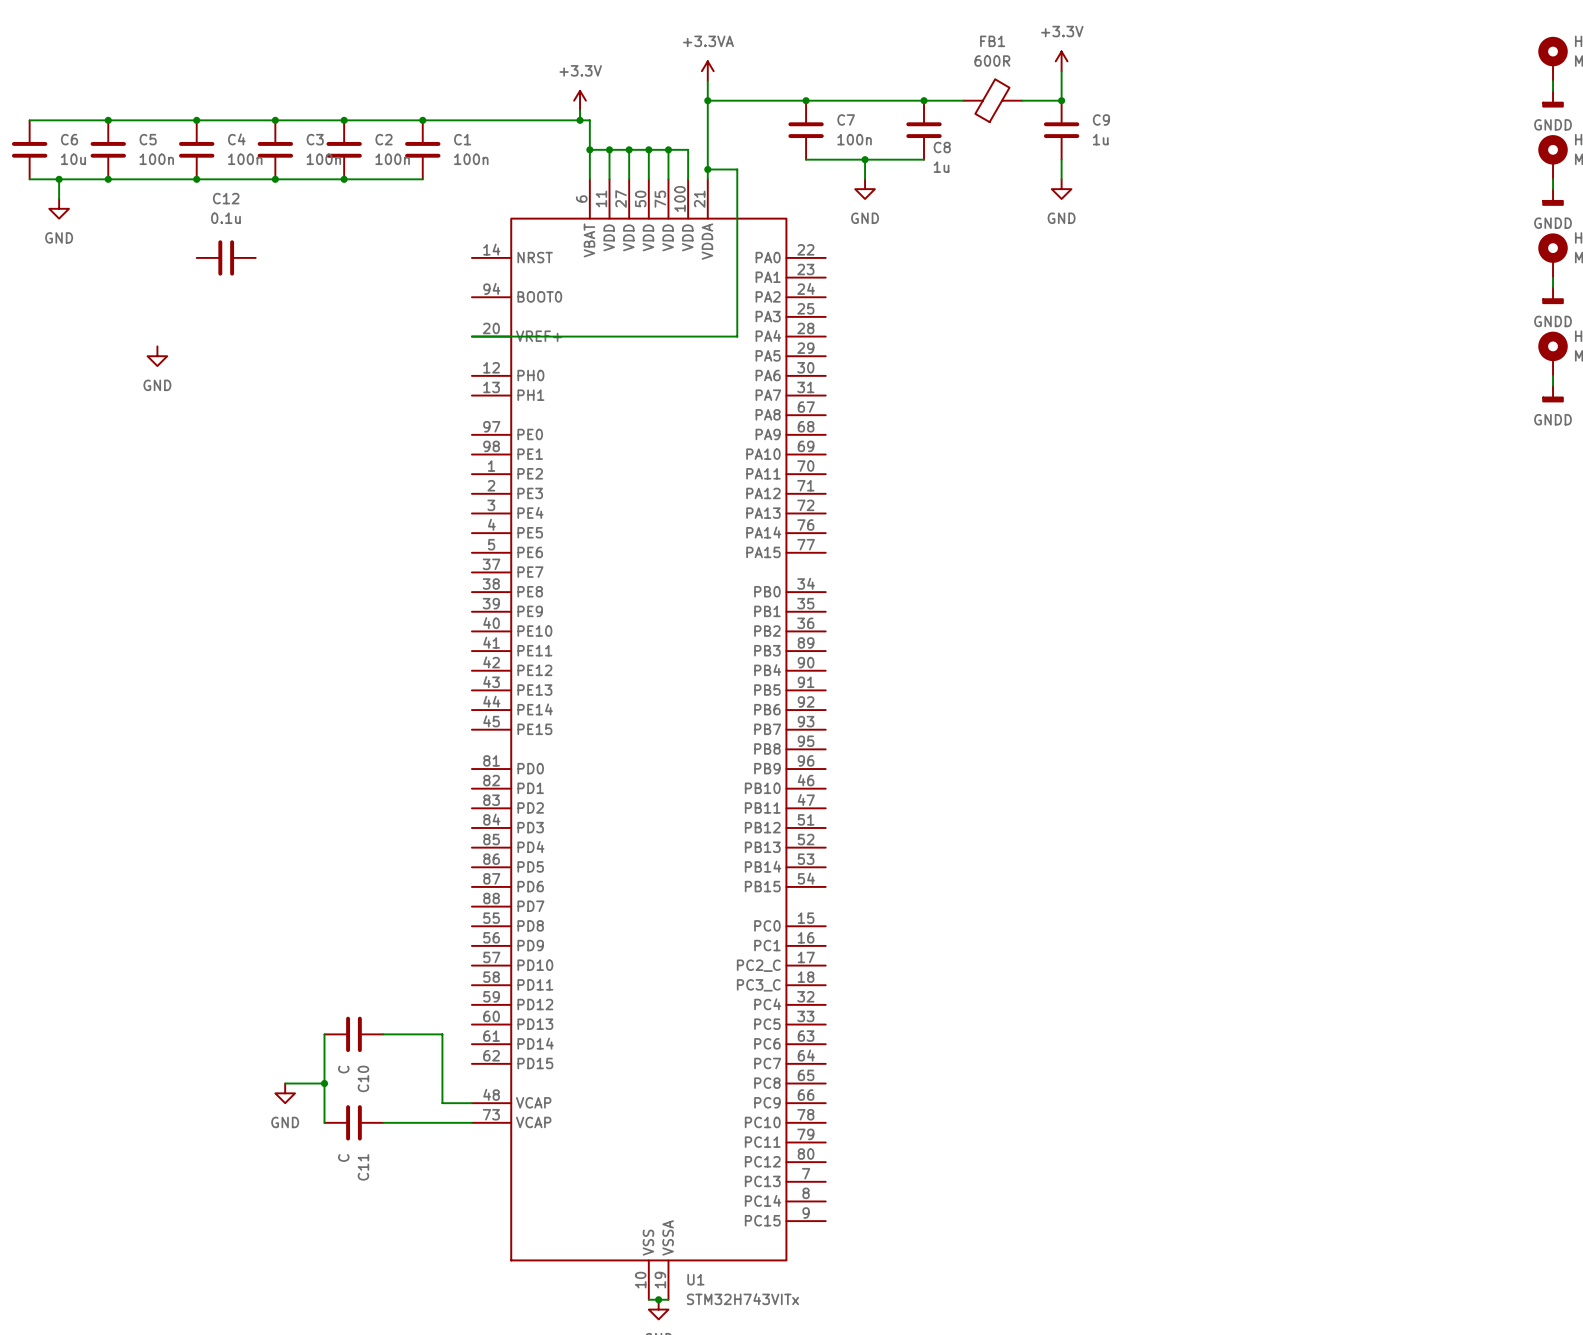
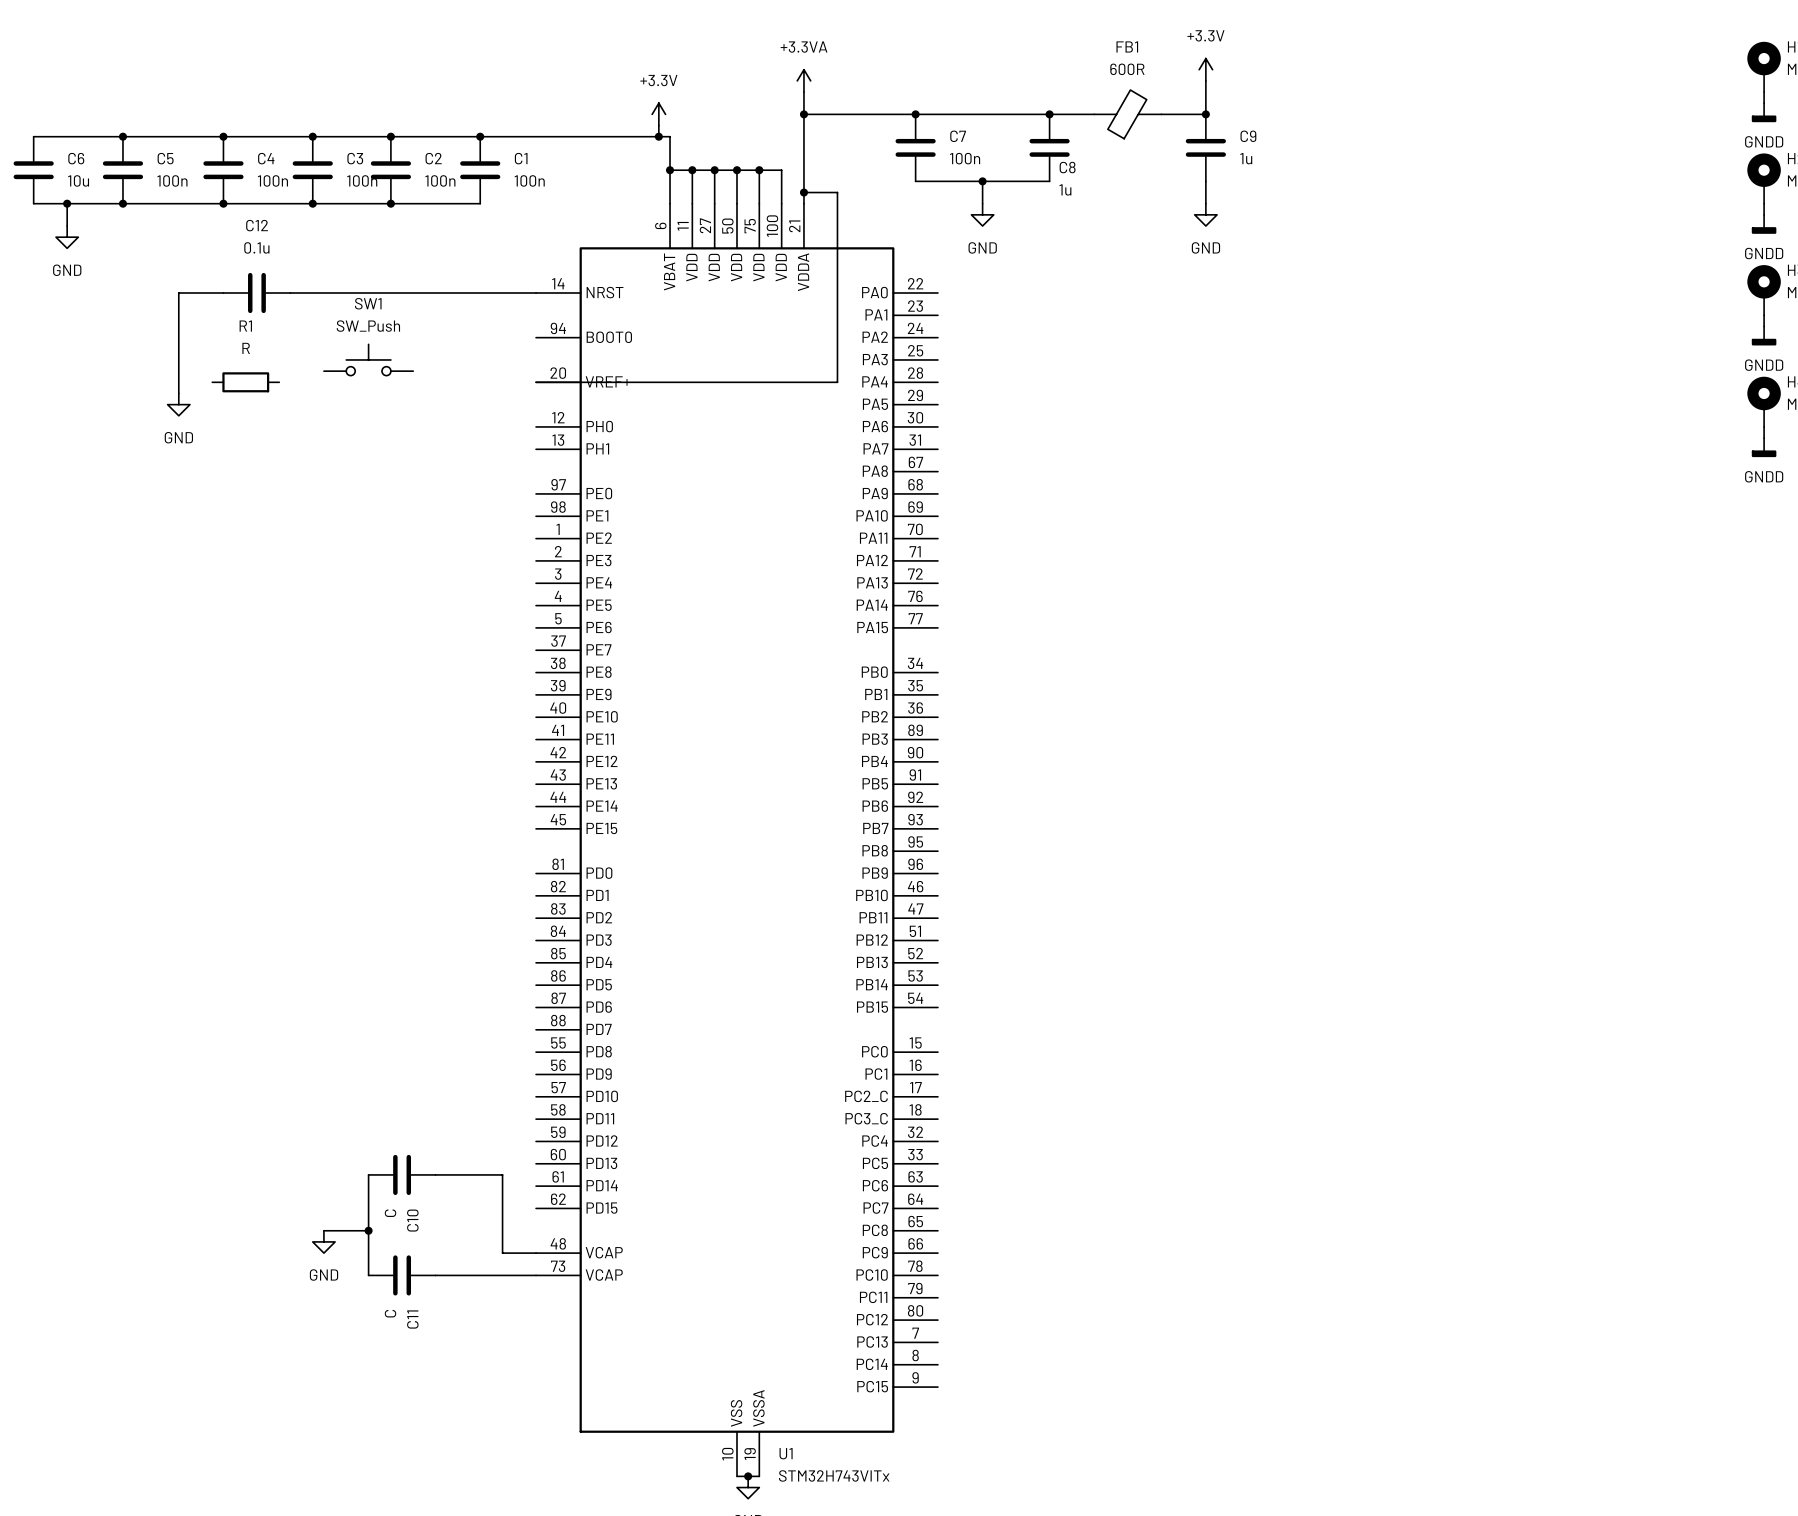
wire: none -> (223, 293) (178, 293) (178, 393)
wire: none -> (290, 293) (536, 293)
SW1: none -> SW_Push (368, 359)
R1: none -> R (245, 382)

